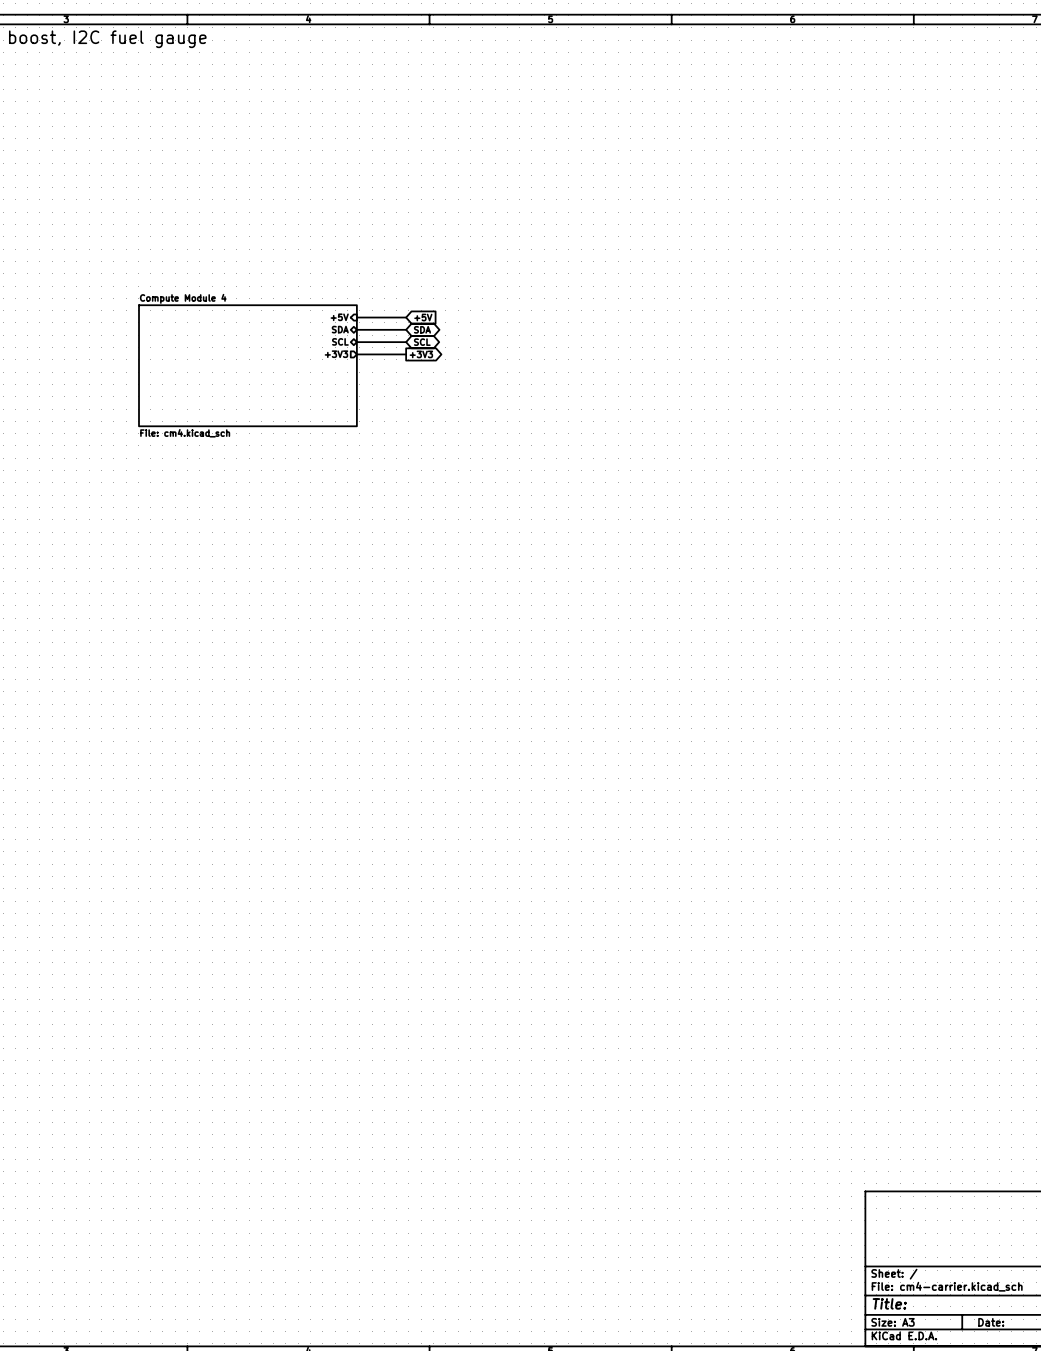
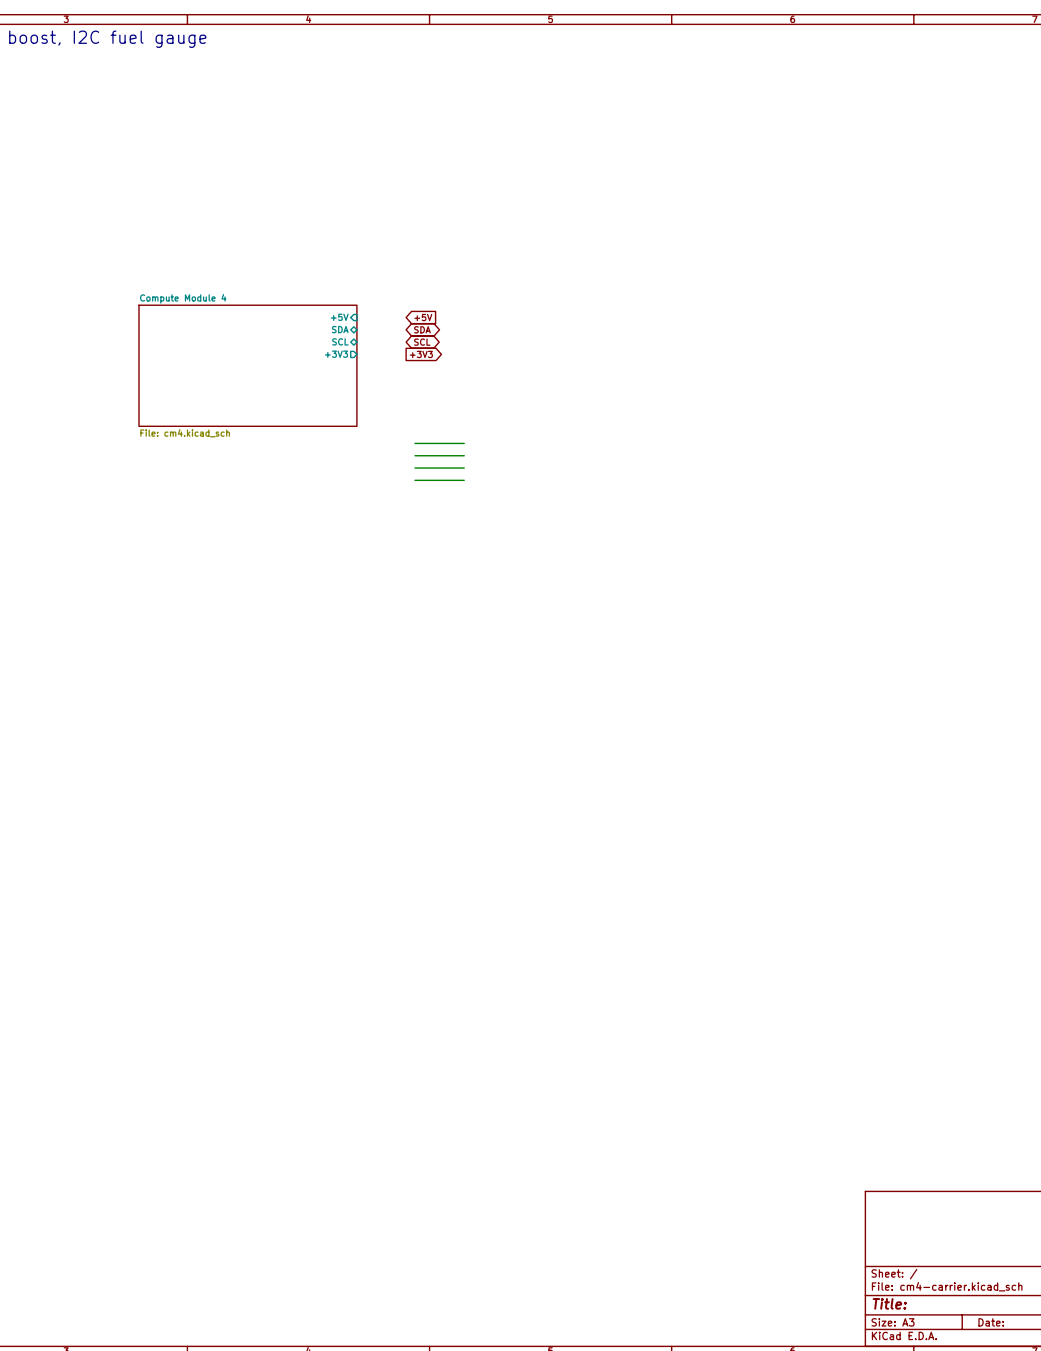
wire: (356, 317) (406, 317) -> none
wire: (356, 329) (406, 329) -> none
wire: (356, 342) (406, 342) -> (415, 443) (464, 443)
wire: (356, 354) (406, 354) -> (415, 455) (464, 455)
wire: none -> (415, 468) (464, 468)
wire: none -> (415, 480) (464, 480)

